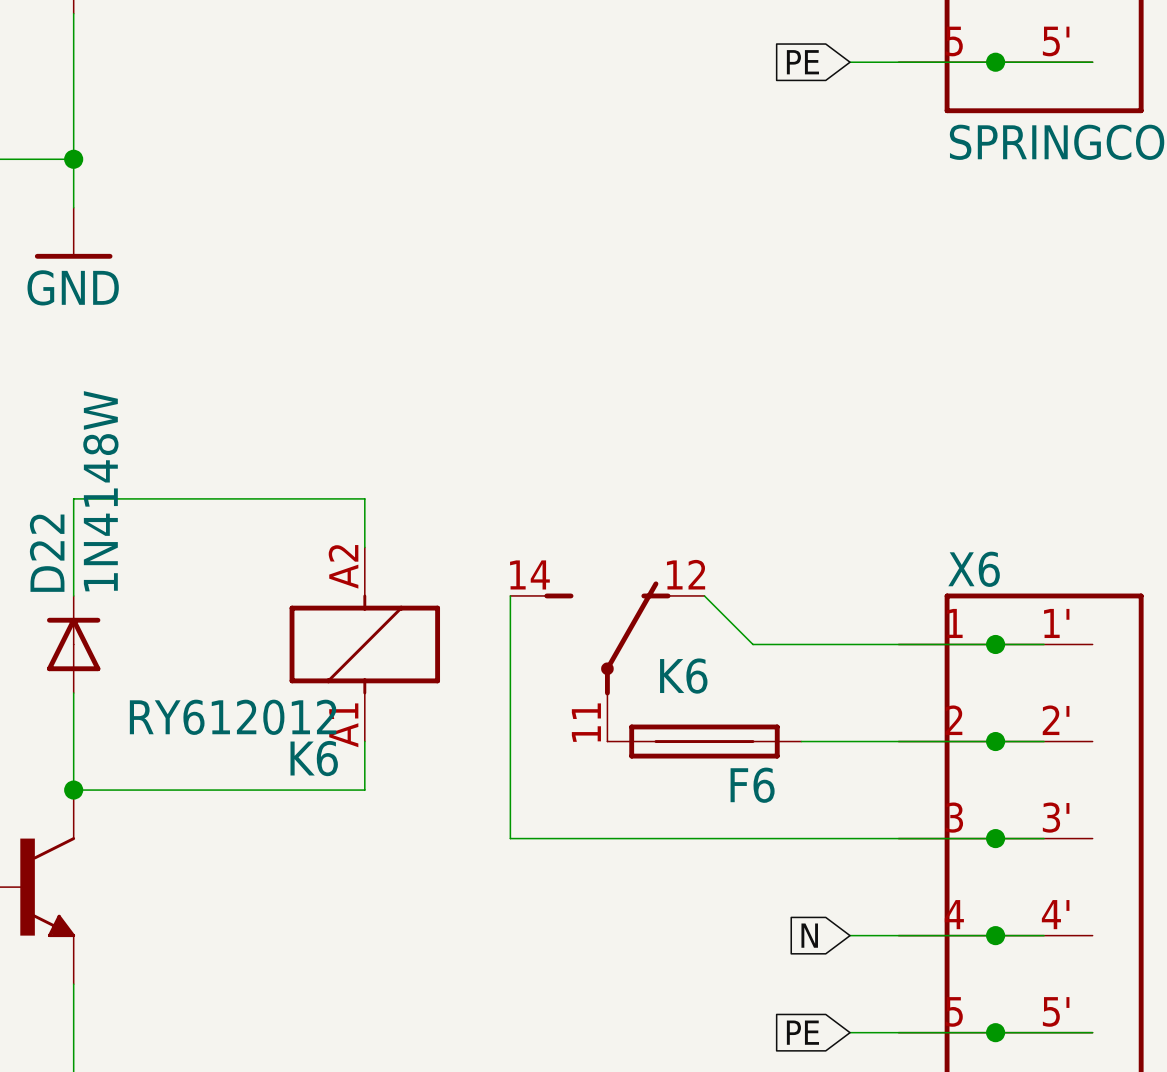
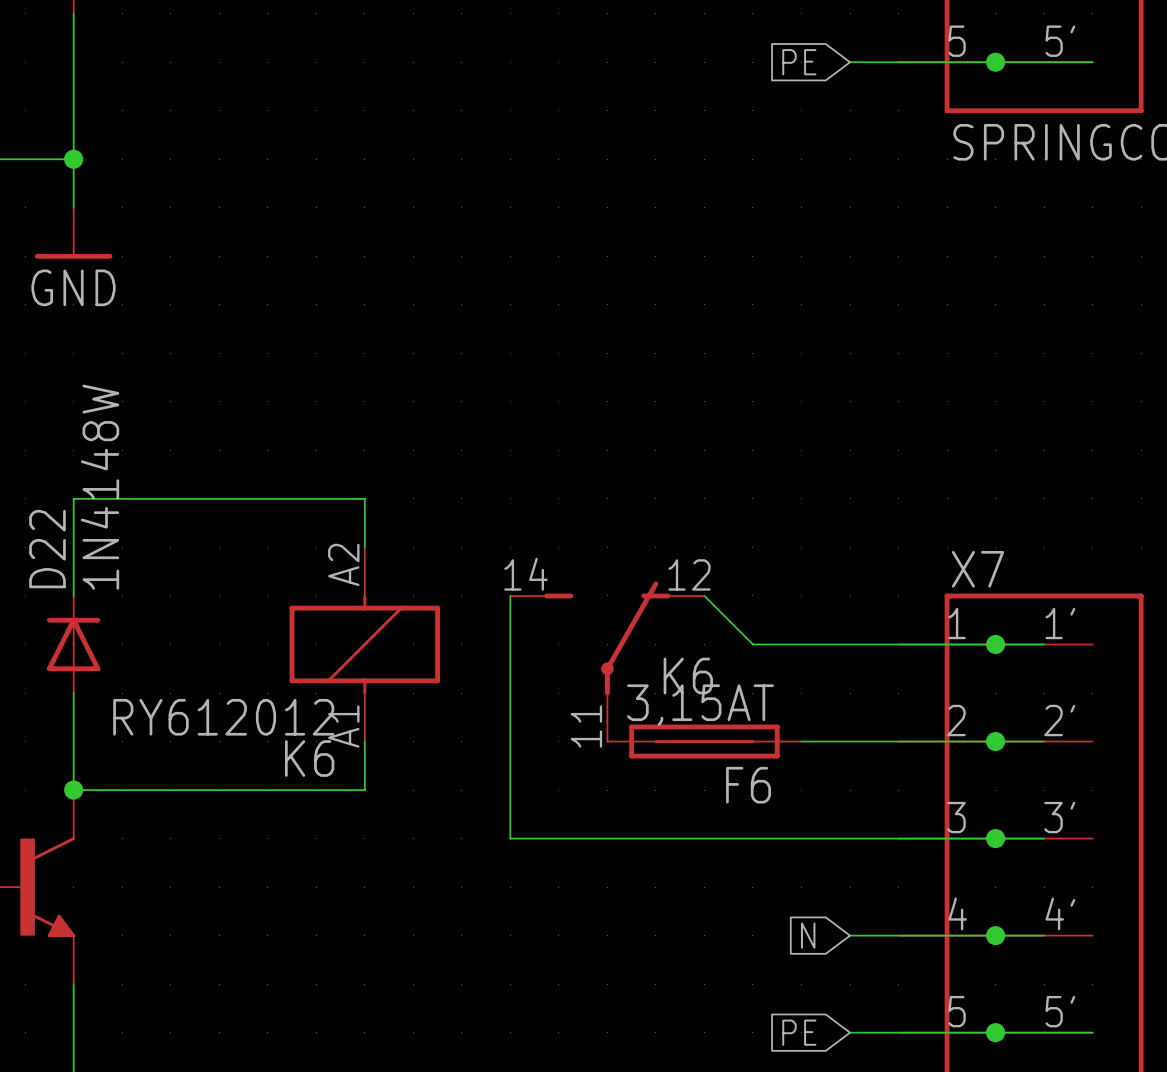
X6 name: X6 (974, 569) -> X7 (977, 569)
F6 value: none -> 3,15AT (700, 705)

